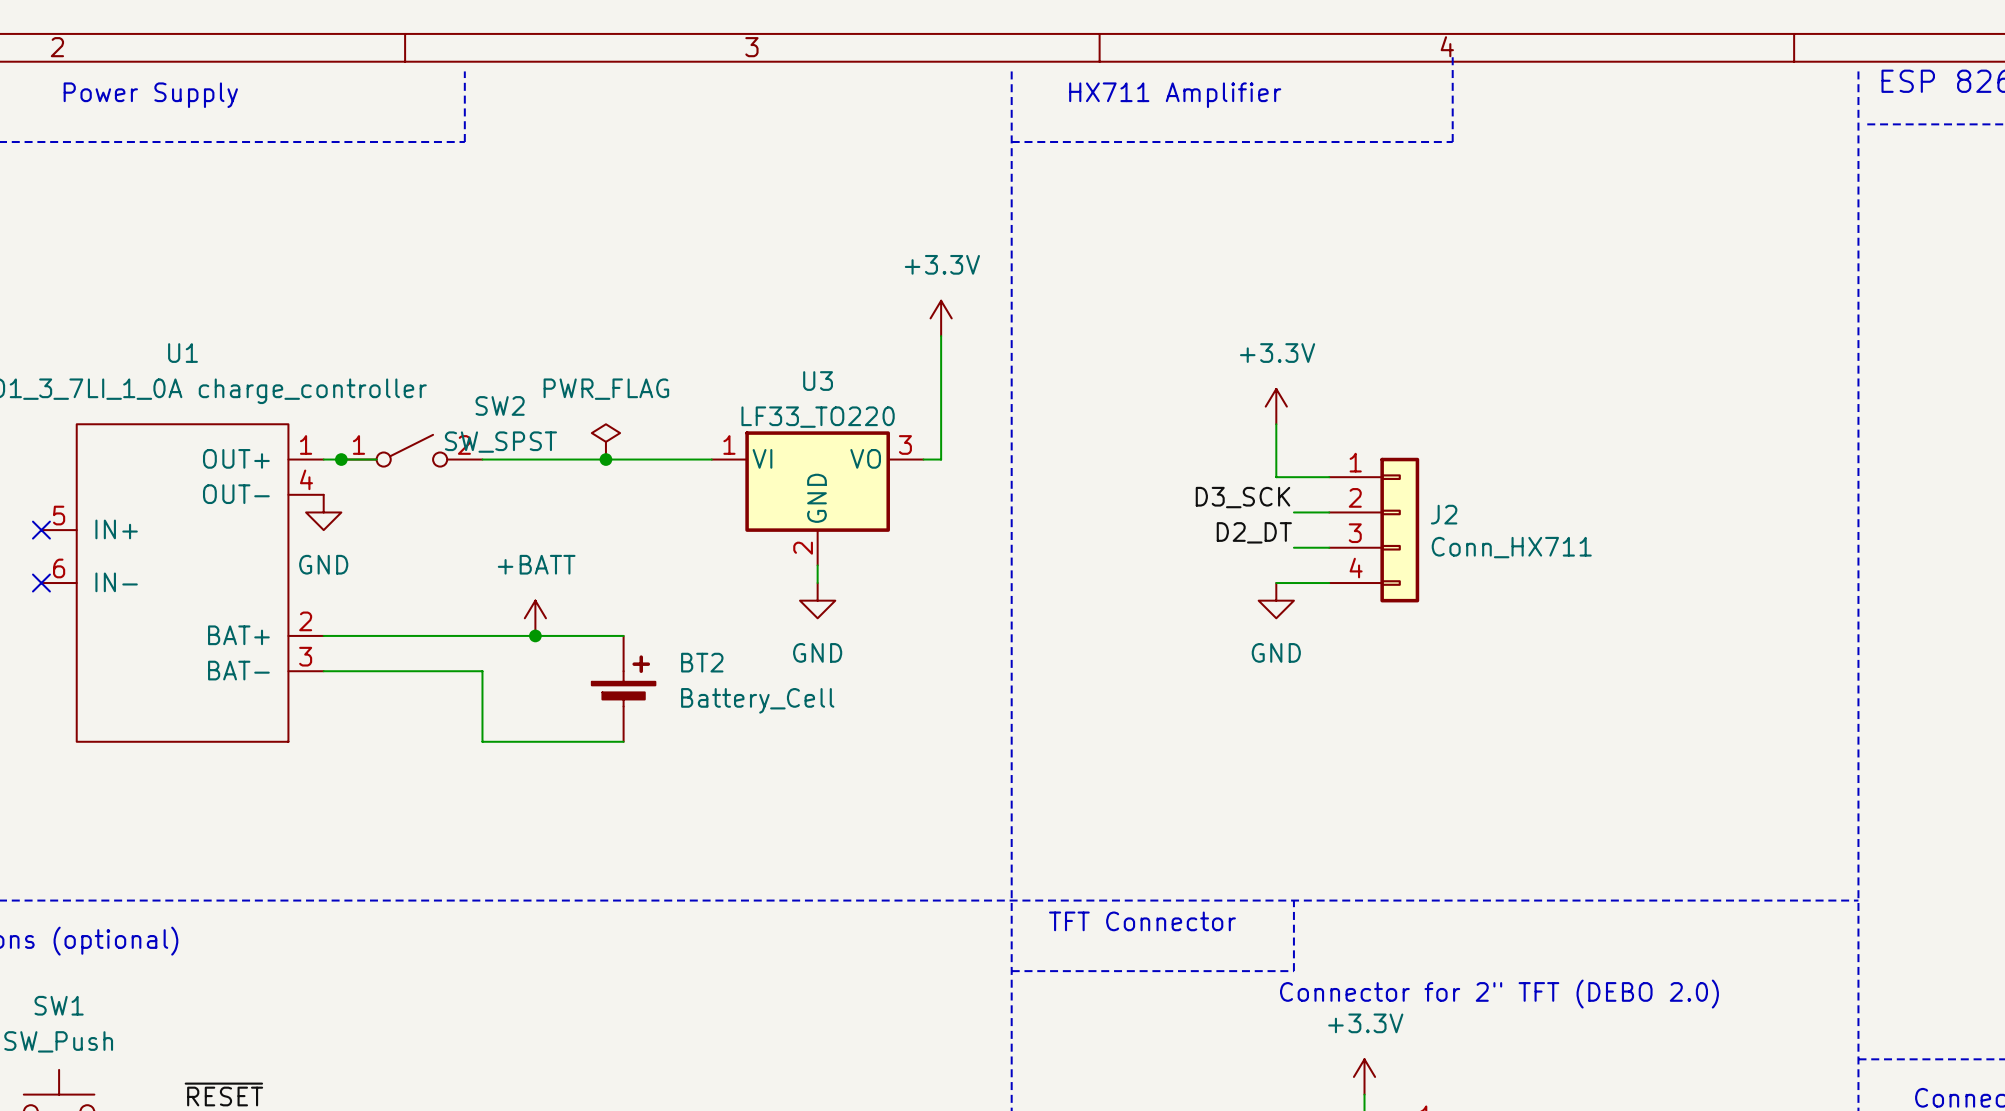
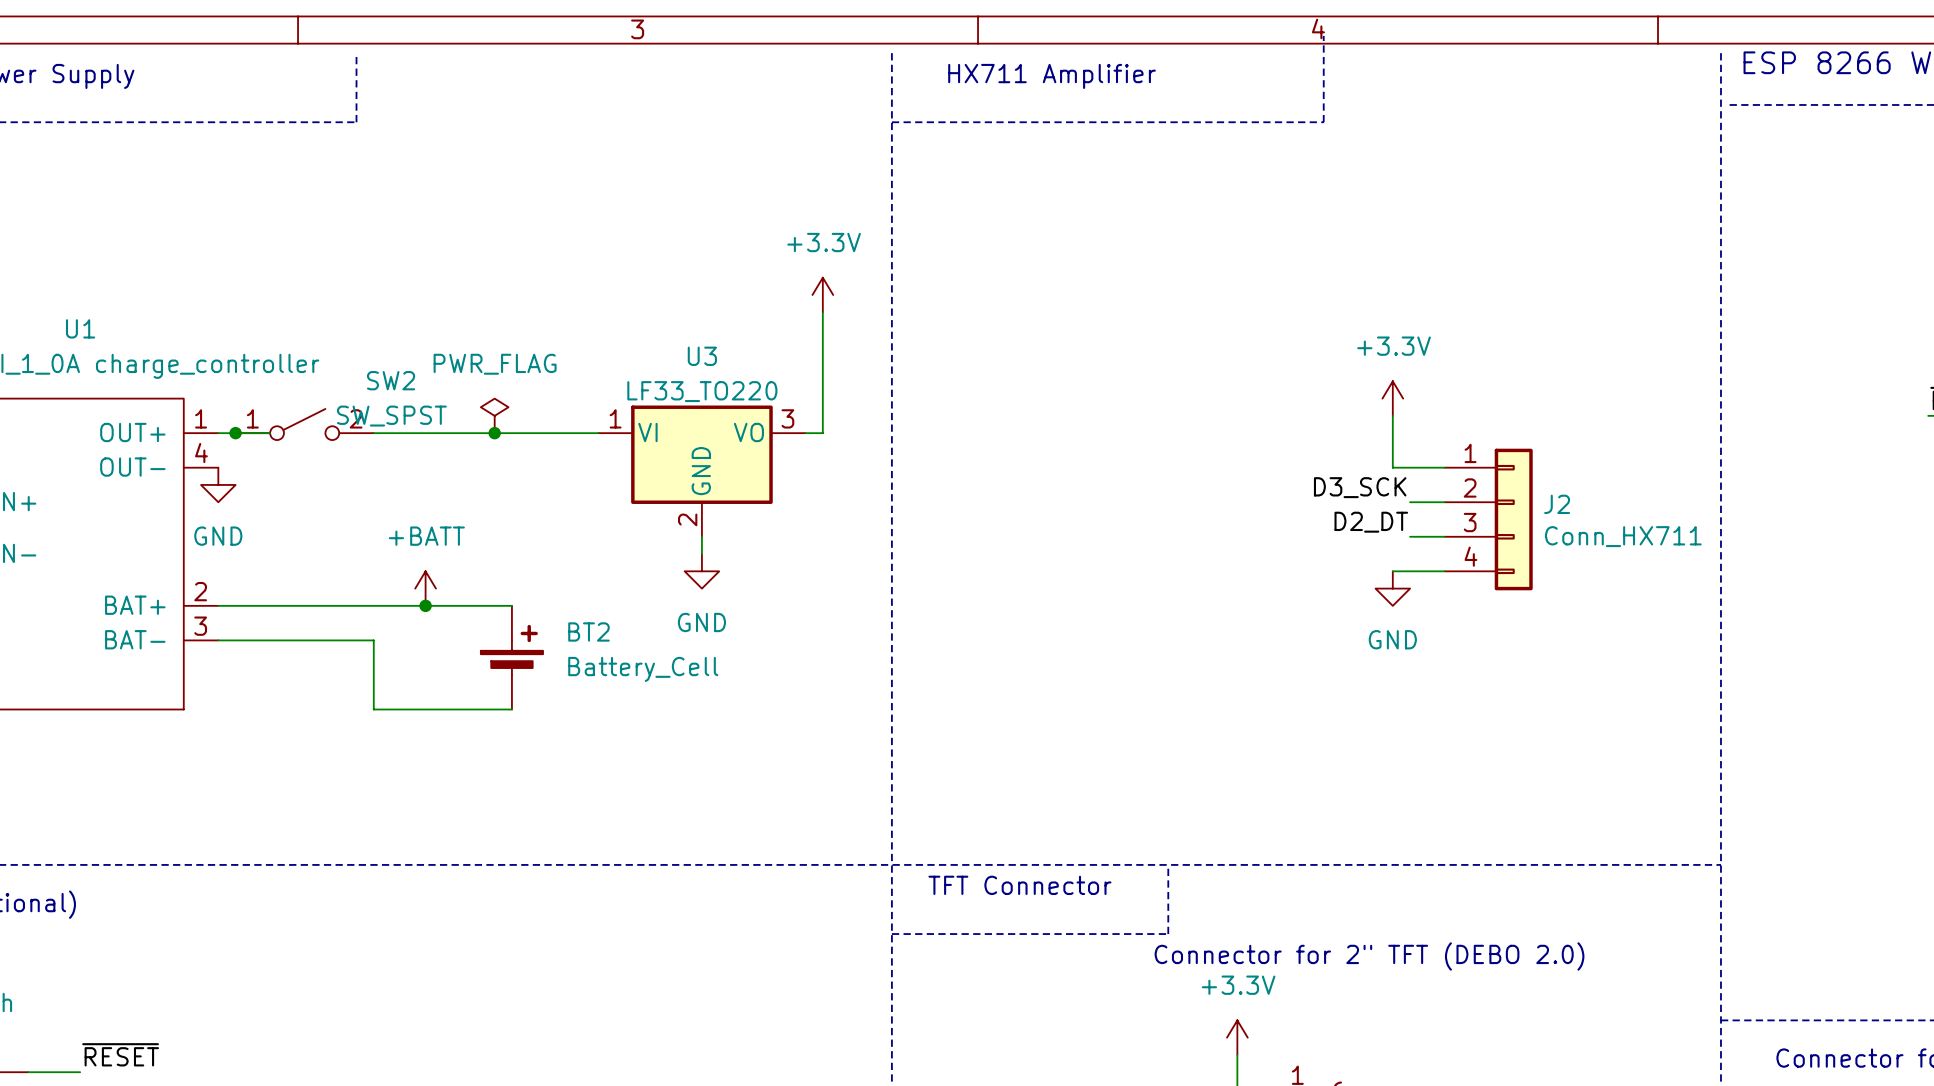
power symbol position: +3.3V (1276, 406) -> +3.3V (1392, 398)
wire: (1276, 424) (1276, 477) (1329, 477) -> (1392, 415) (1392, 467) (1444, 467)
label position: D3_SCK (1242, 497) -> D3_SCK (1360, 487)
wire: (1293, 512) (1329, 512) -> (1410, 502) (1444, 502)
J2 position: (1374, 530) -> (1488, 519)
label position: D2_DT (1254, 532) -> D2_DT (1371, 522)
wire: (1293, 547) (1329, 547) -> (1410, 536) (1444, 536)
wire: (1276, 583) (1329, 583) -> (1392, 571) (1444, 571)
power symbol position: GND (1276, 600) -> GND (1392, 588)

